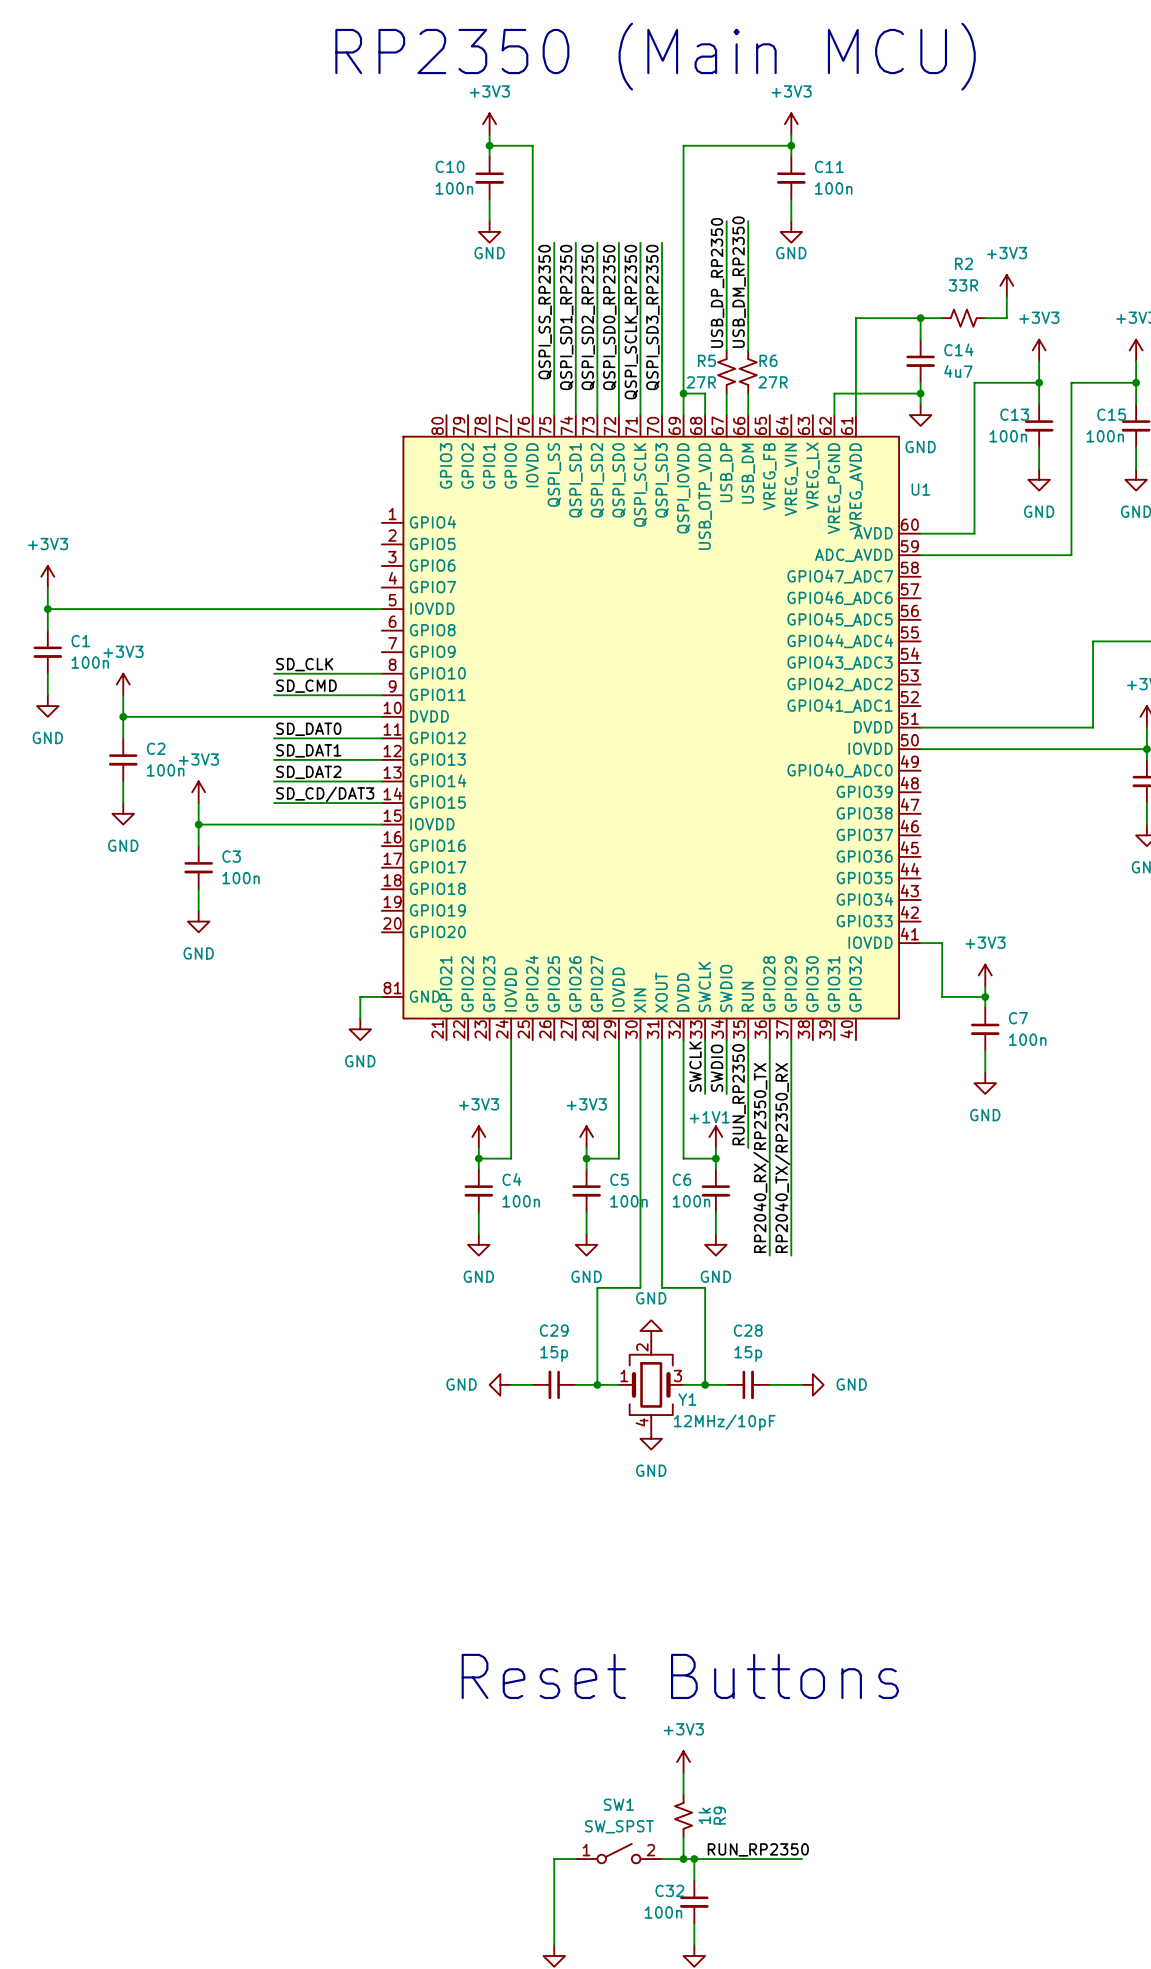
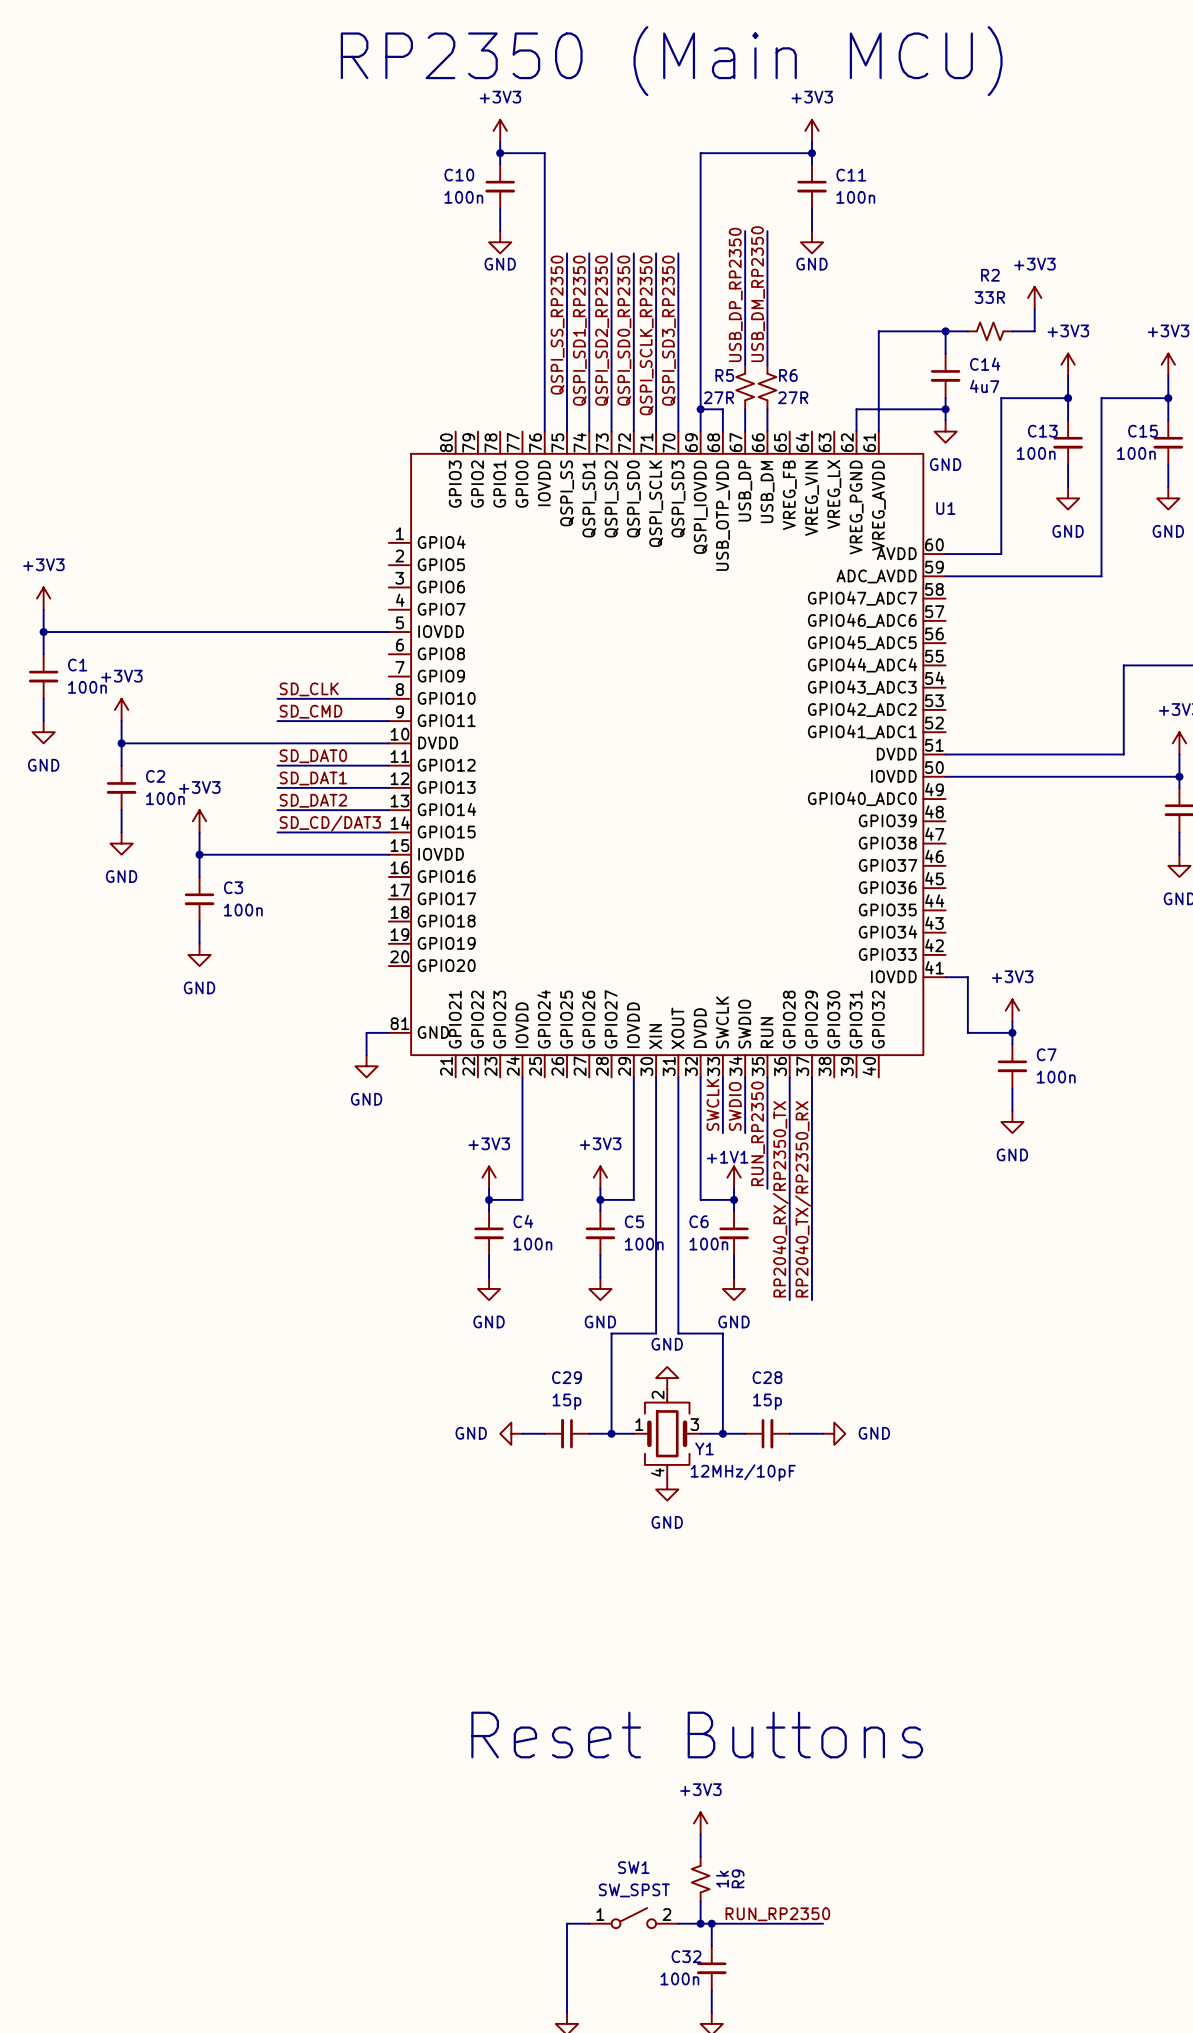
U1 symbol: [381, 415, 921, 1041] -> [388, 431, 946, 1078]

